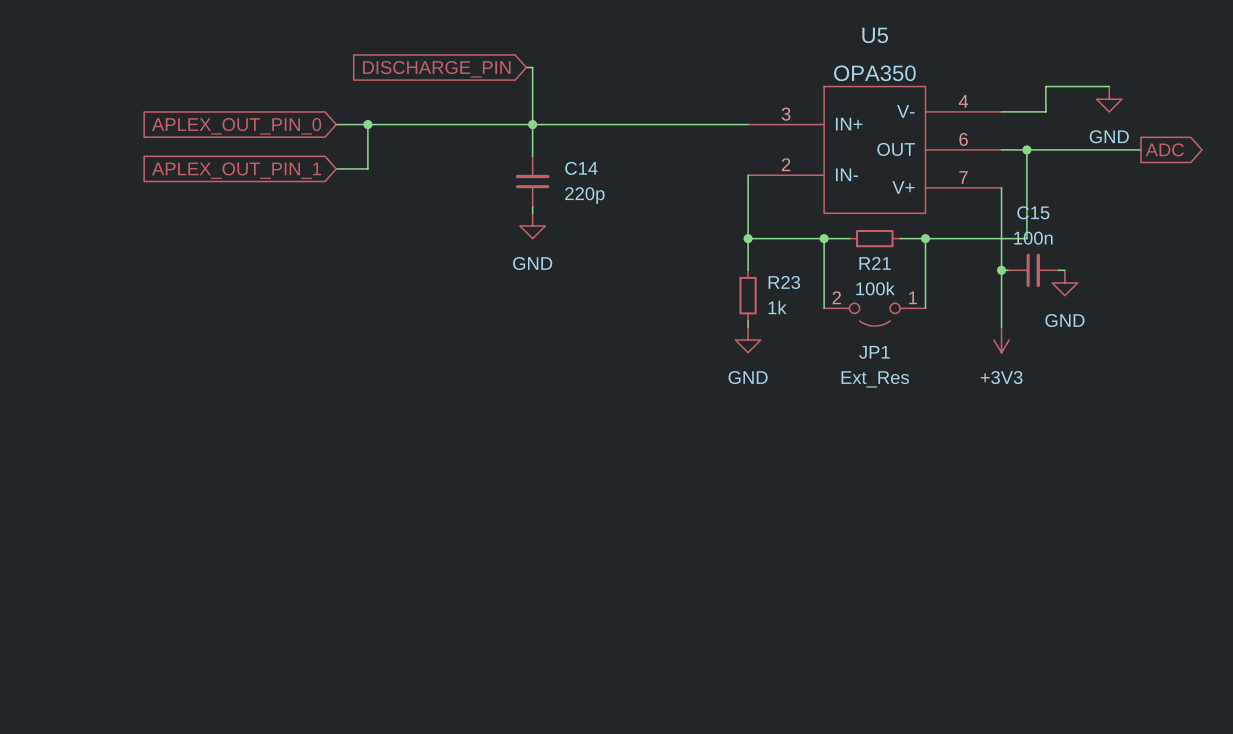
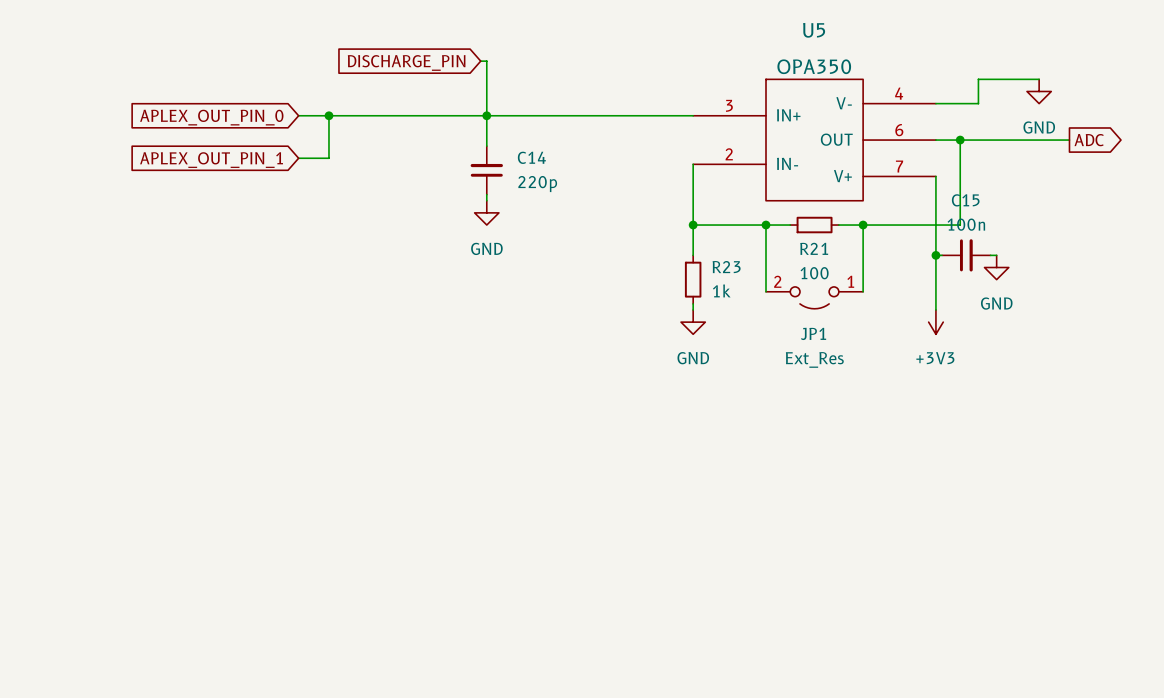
R21 value: 100k (875, 288) -> 100 (814, 273)

